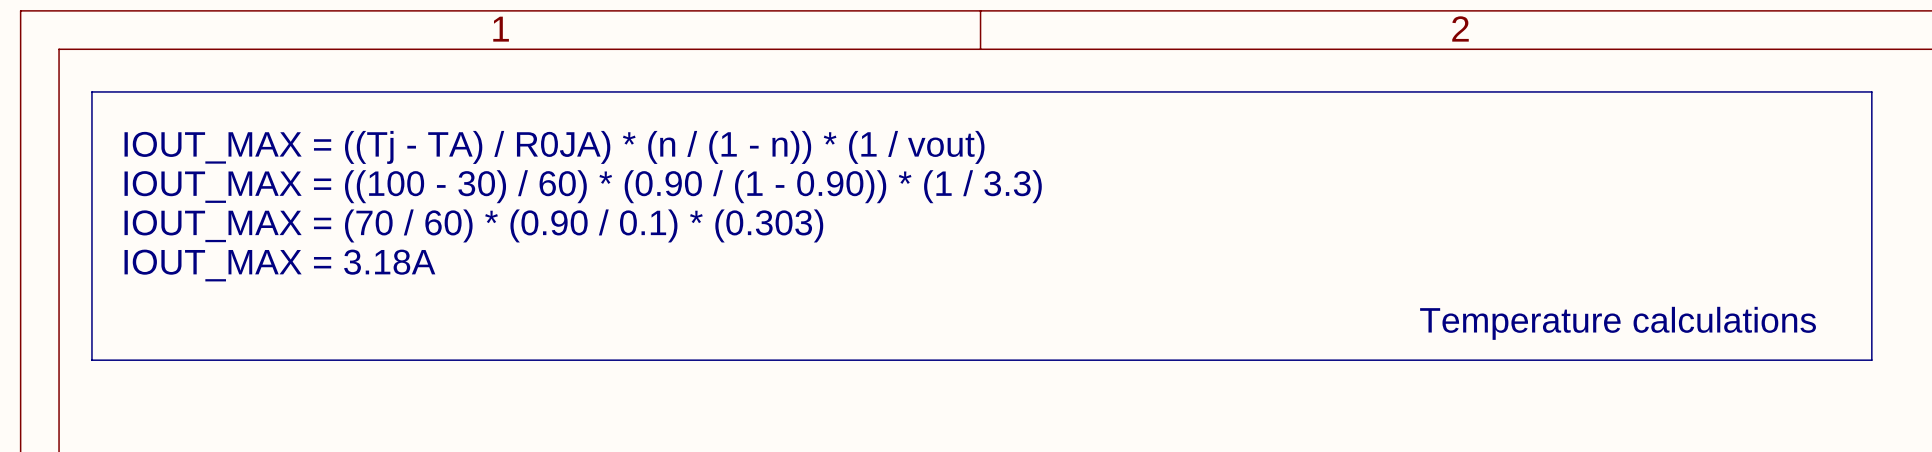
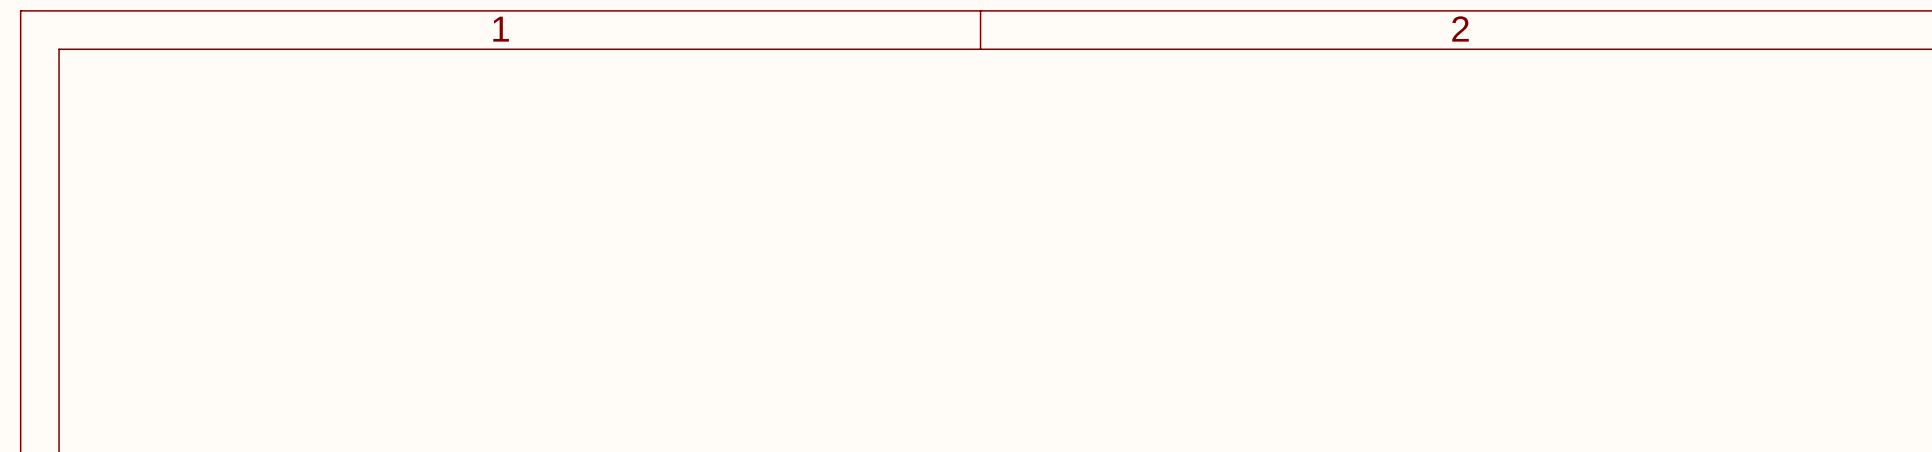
line: (91, 91) (1871, 91) (1871, 360) (91, 360) (91, 91) -> none
text: IOUT_MAX = ((Tj - TA) / R0JA) * (n / (1 - n)) * (1 / vout) (554, 147) -> none
text: IOUT_MAX = ((100 - 30) / 60) * (0.90 / (1 - 0.90)) * (1 / 3.3) (583, 186) -> none
text: IOUT_MAX = (70 / 60) * (0.90 / 0.1) * (0.303) (473, 225) -> none
text: IOUT_MAX = 3.18A (279, 265) -> none
text: Temperature calculations (1618, 323) -> none

